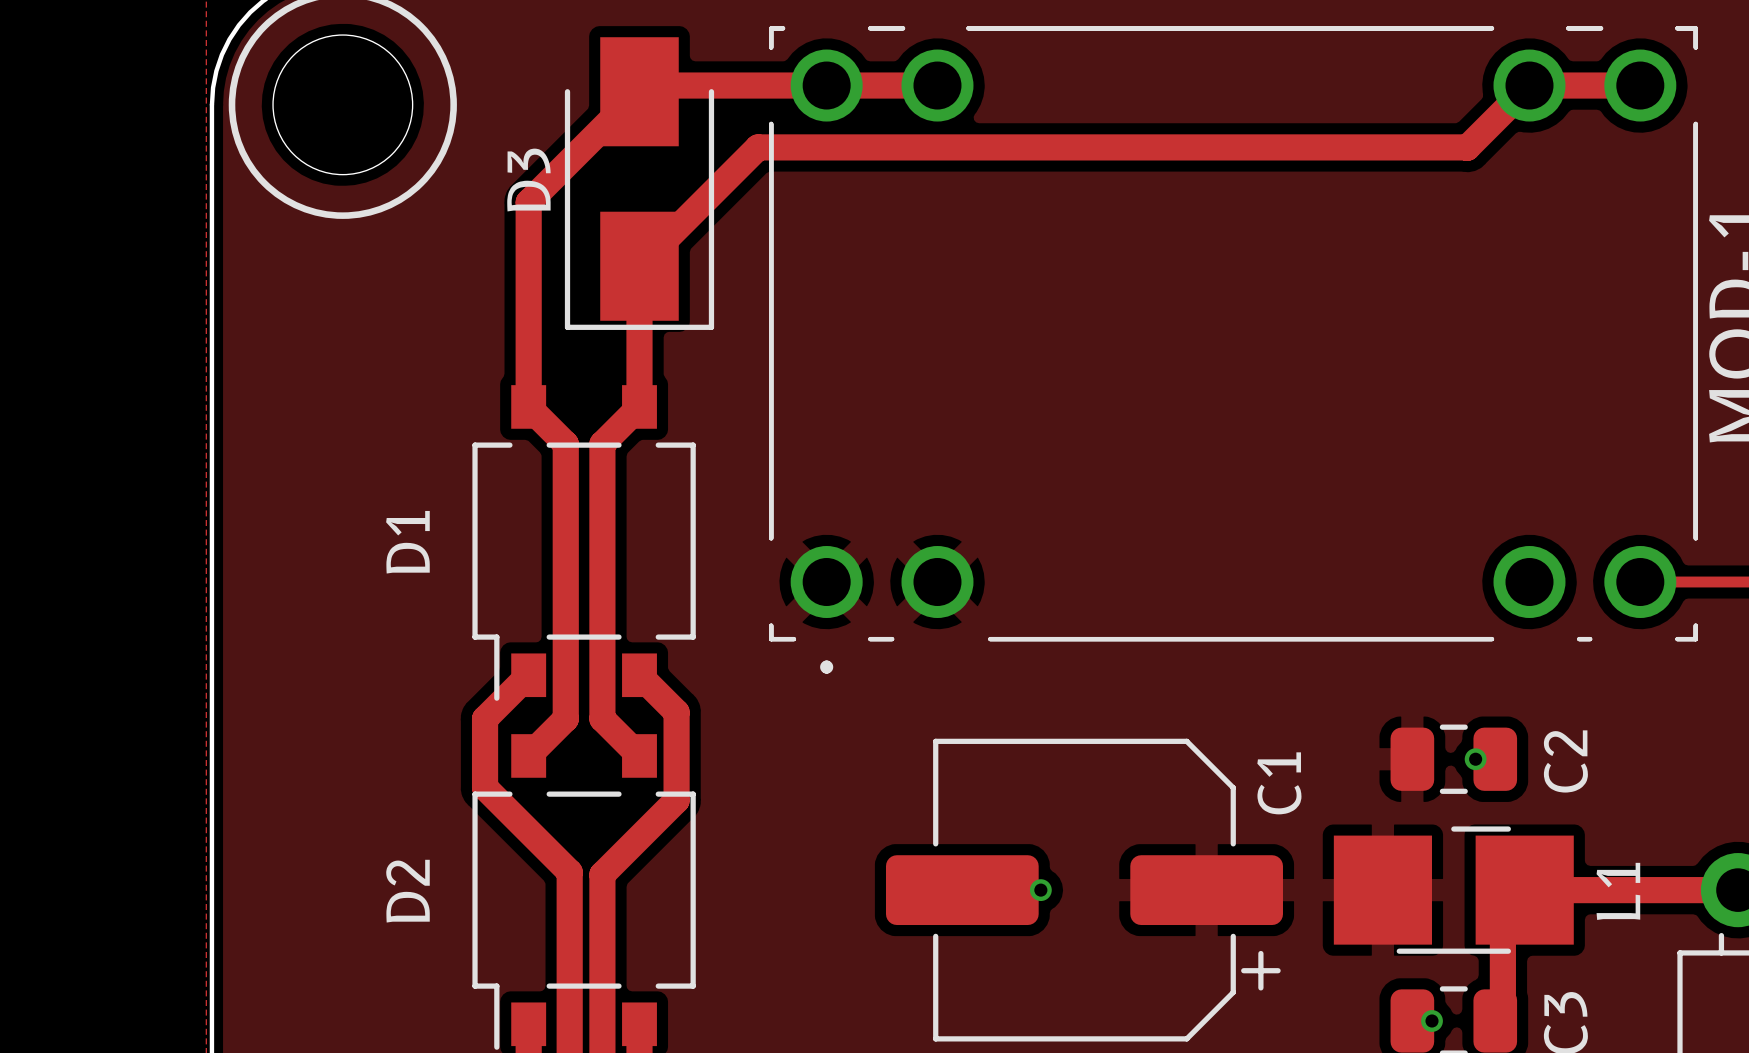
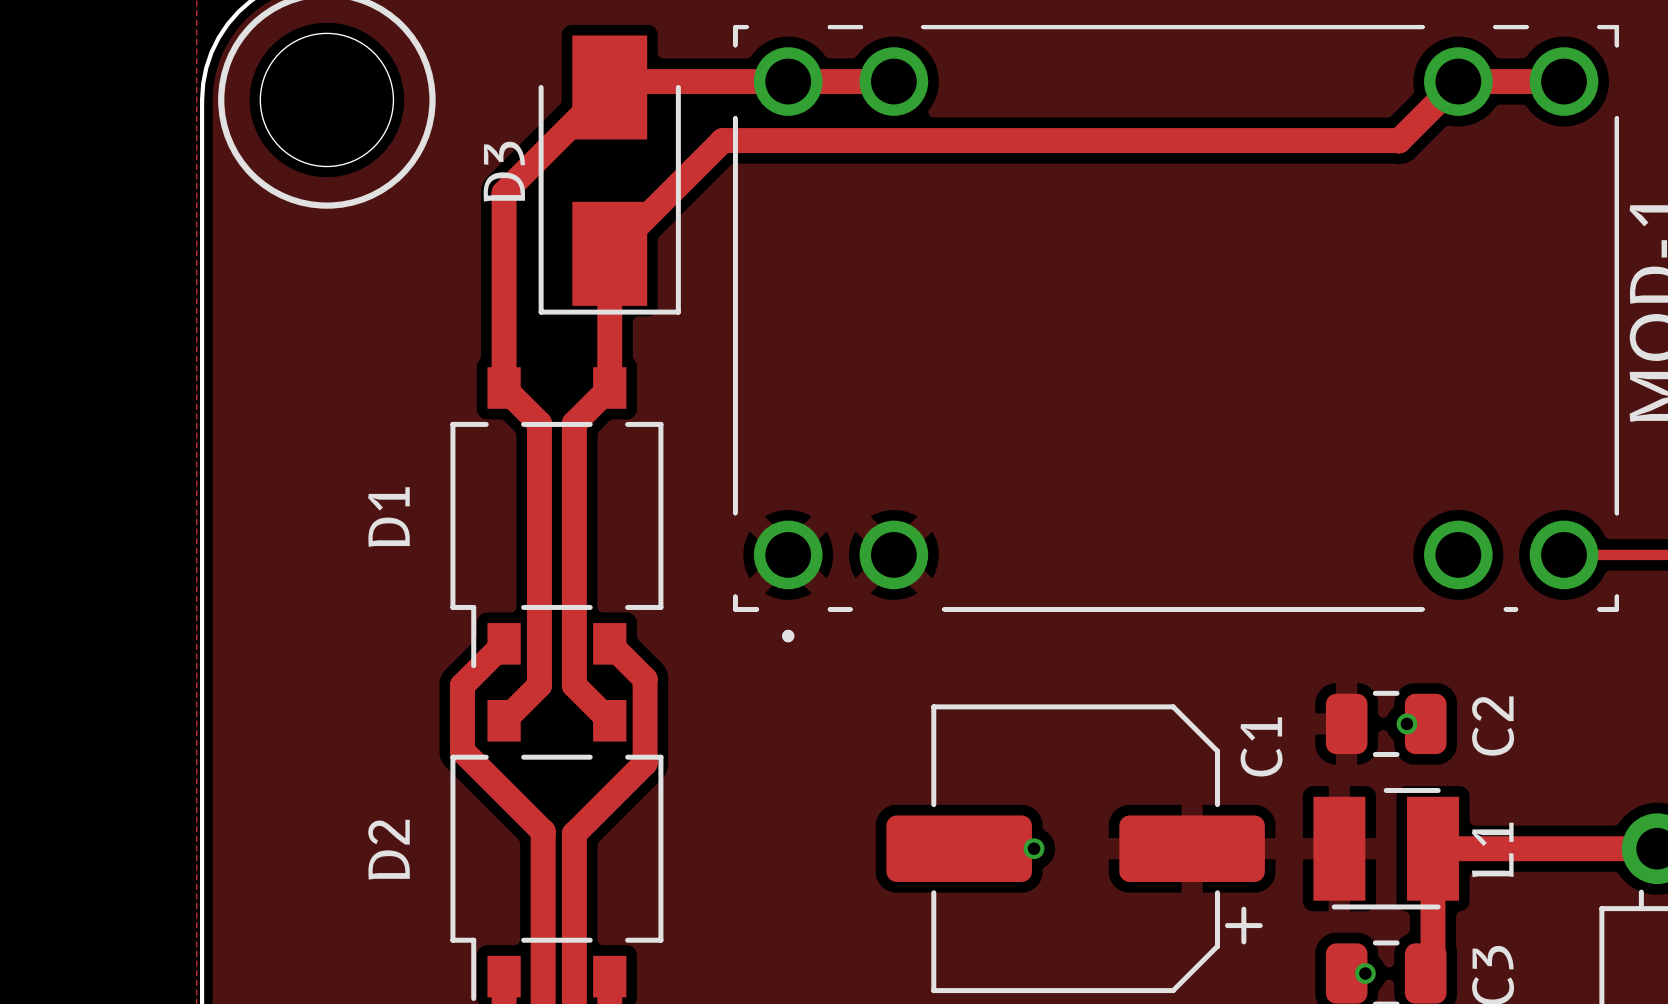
L1 footprint: [1333, 826, 1574, 954] -> [1313, 787, 1459, 910]
via position: (1040, 890) -> (1034, 848)
C1 position: (1084, 890) -> (1075, 848)
L1 name position: L1 (1618, 891) -> L1 (1492, 849)

